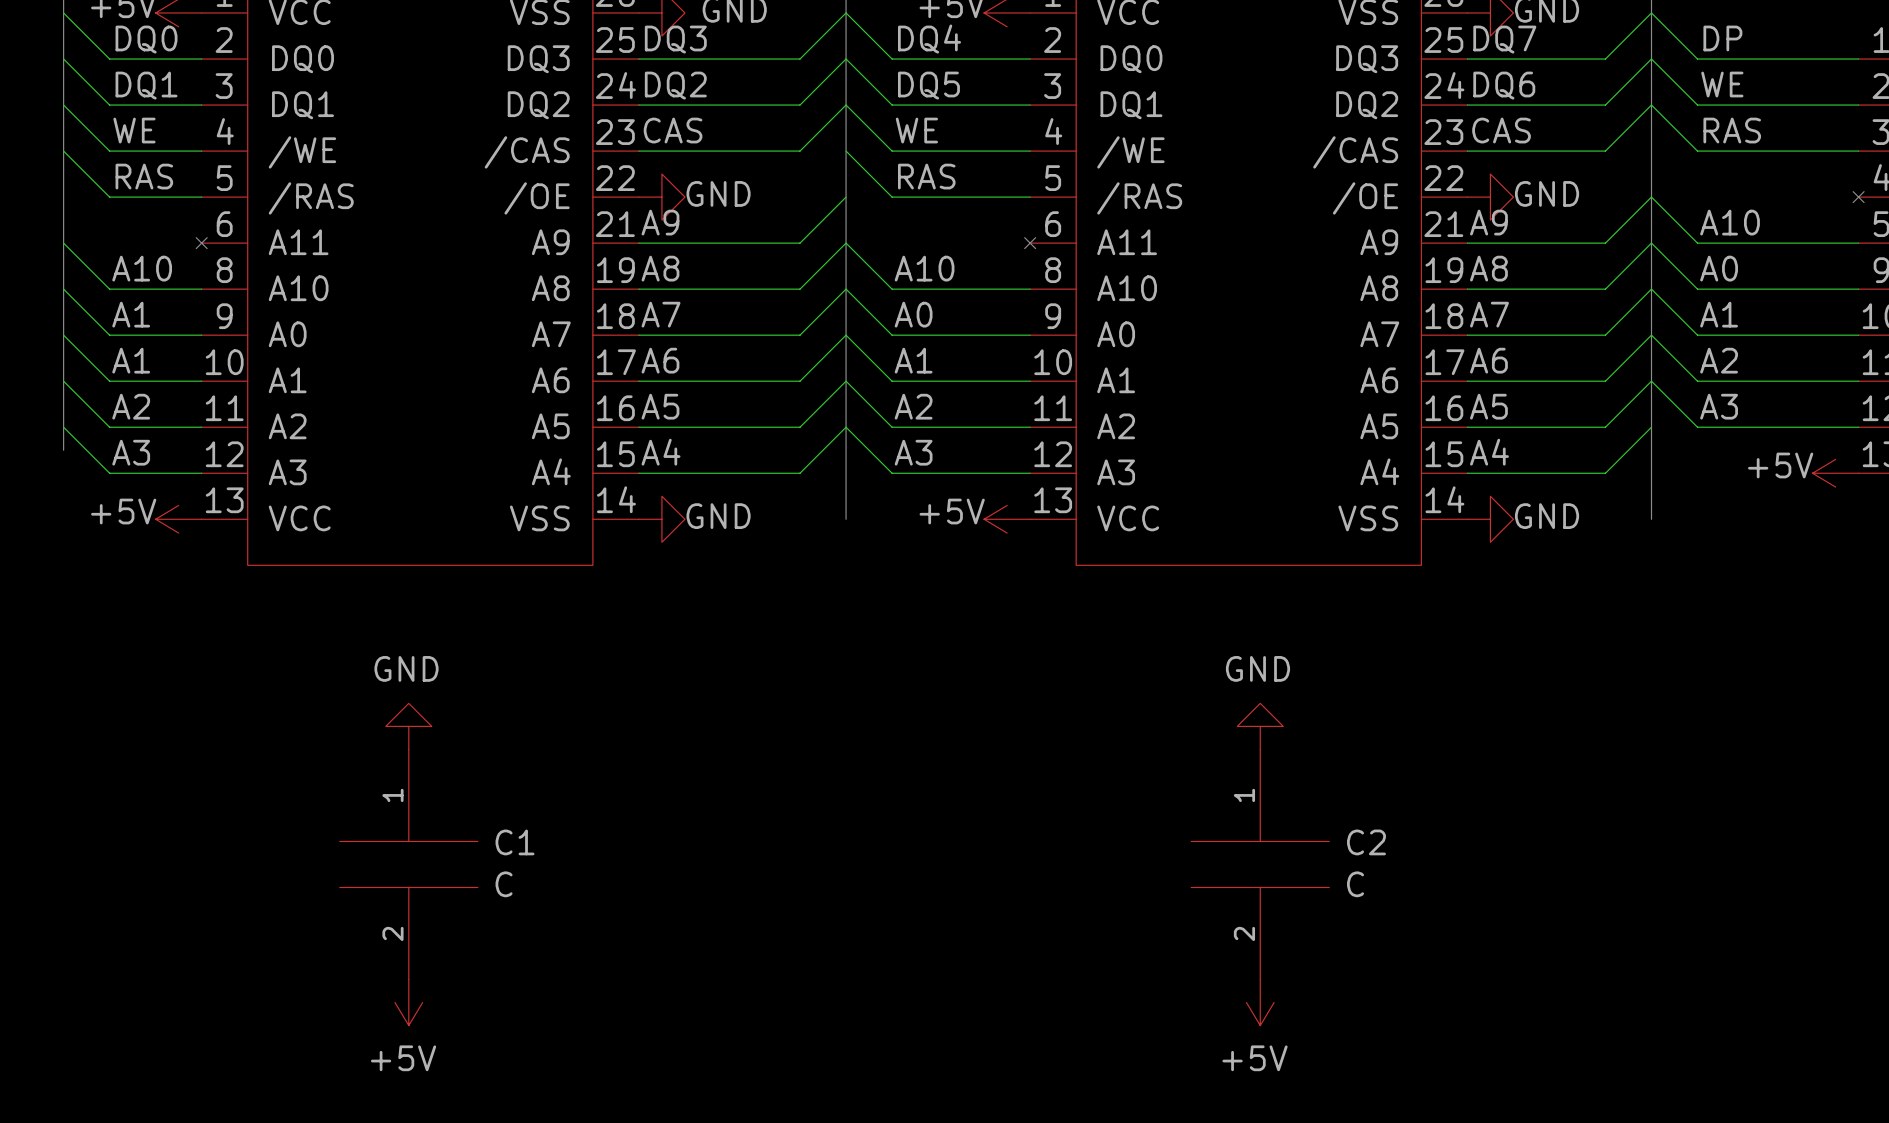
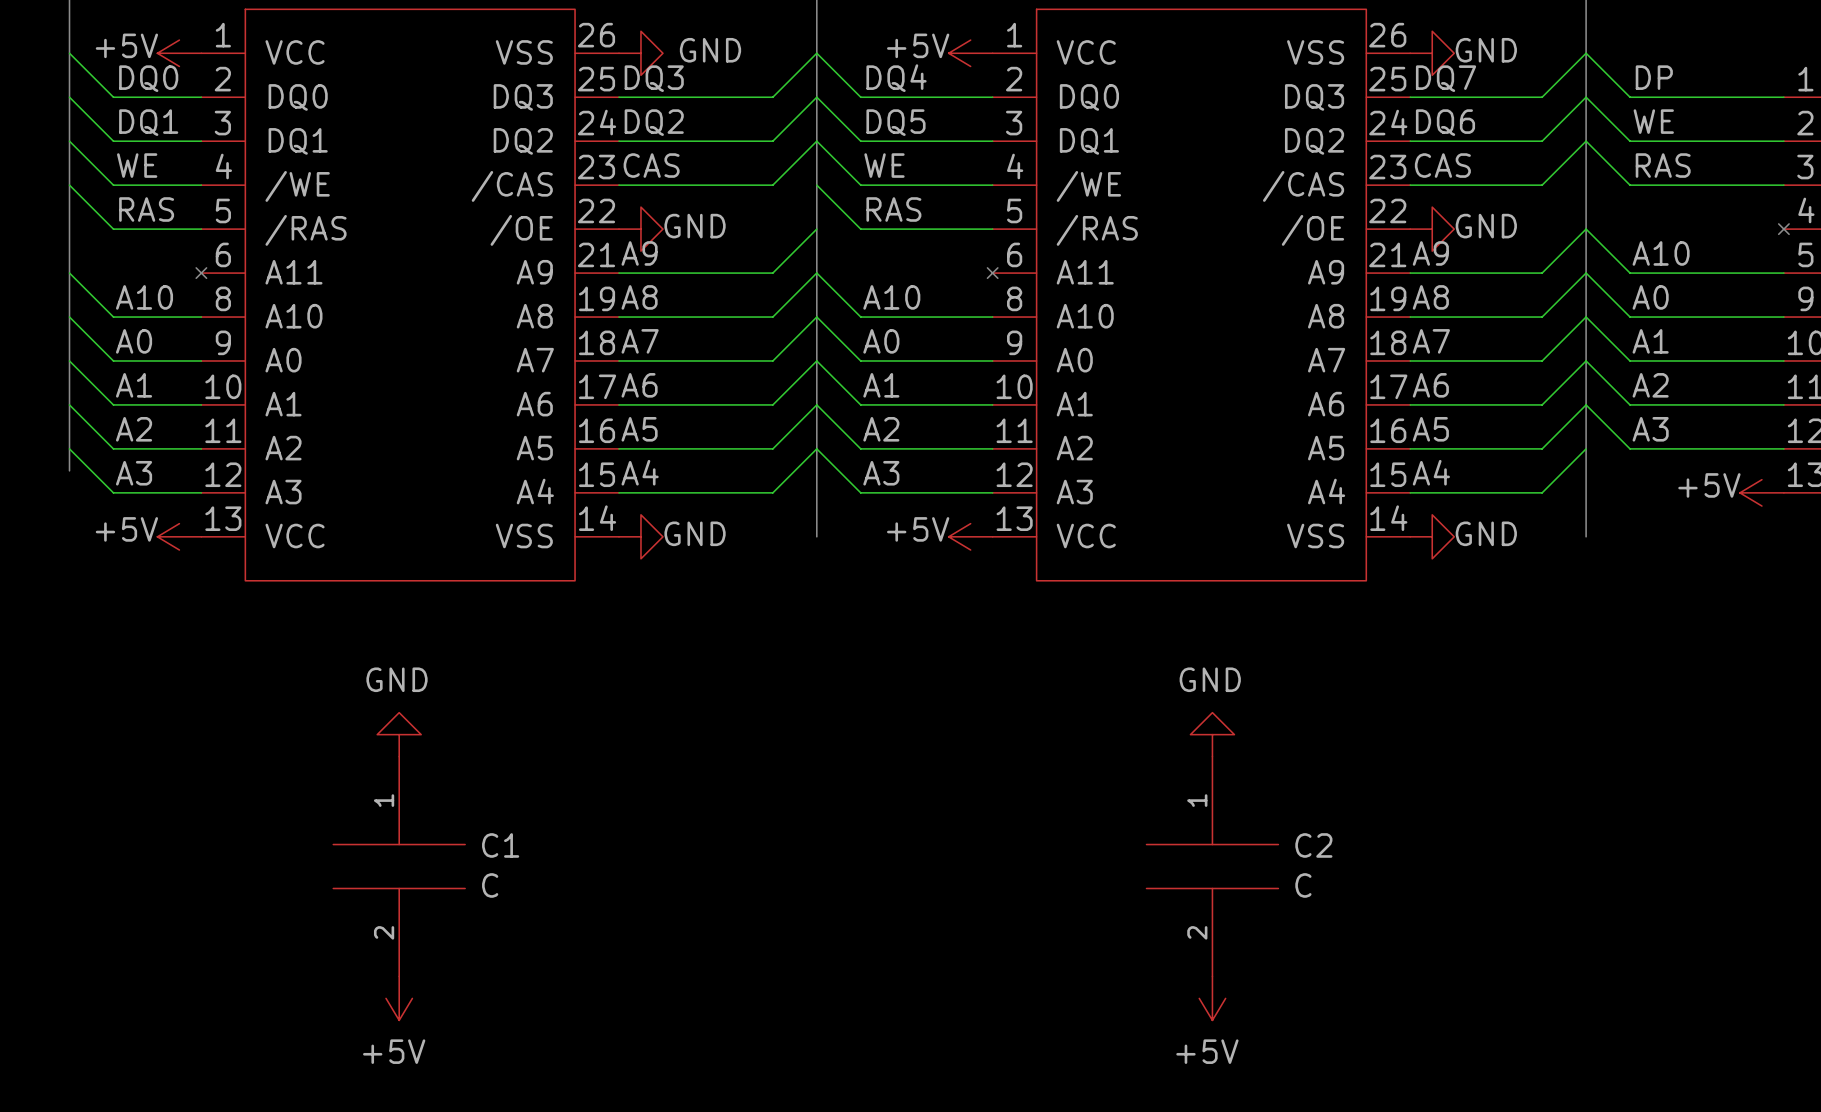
label: A1 (131, 314) -> A0 (134, 341)

